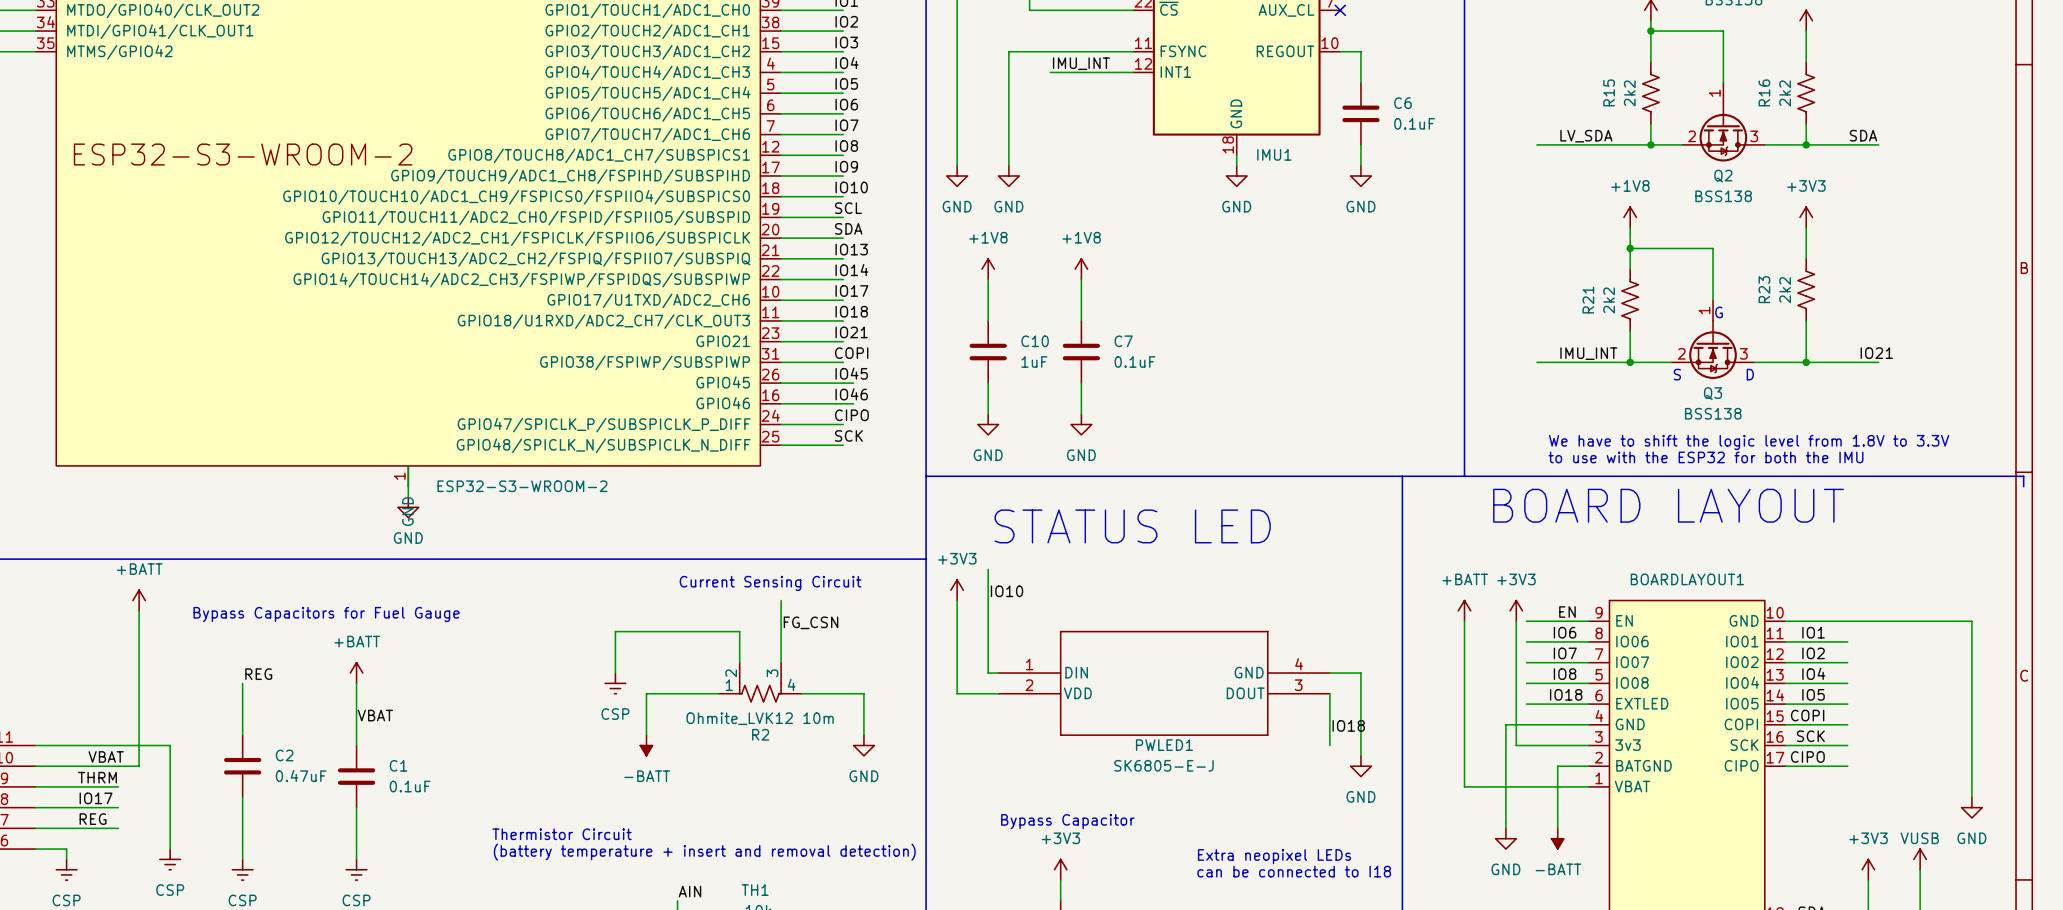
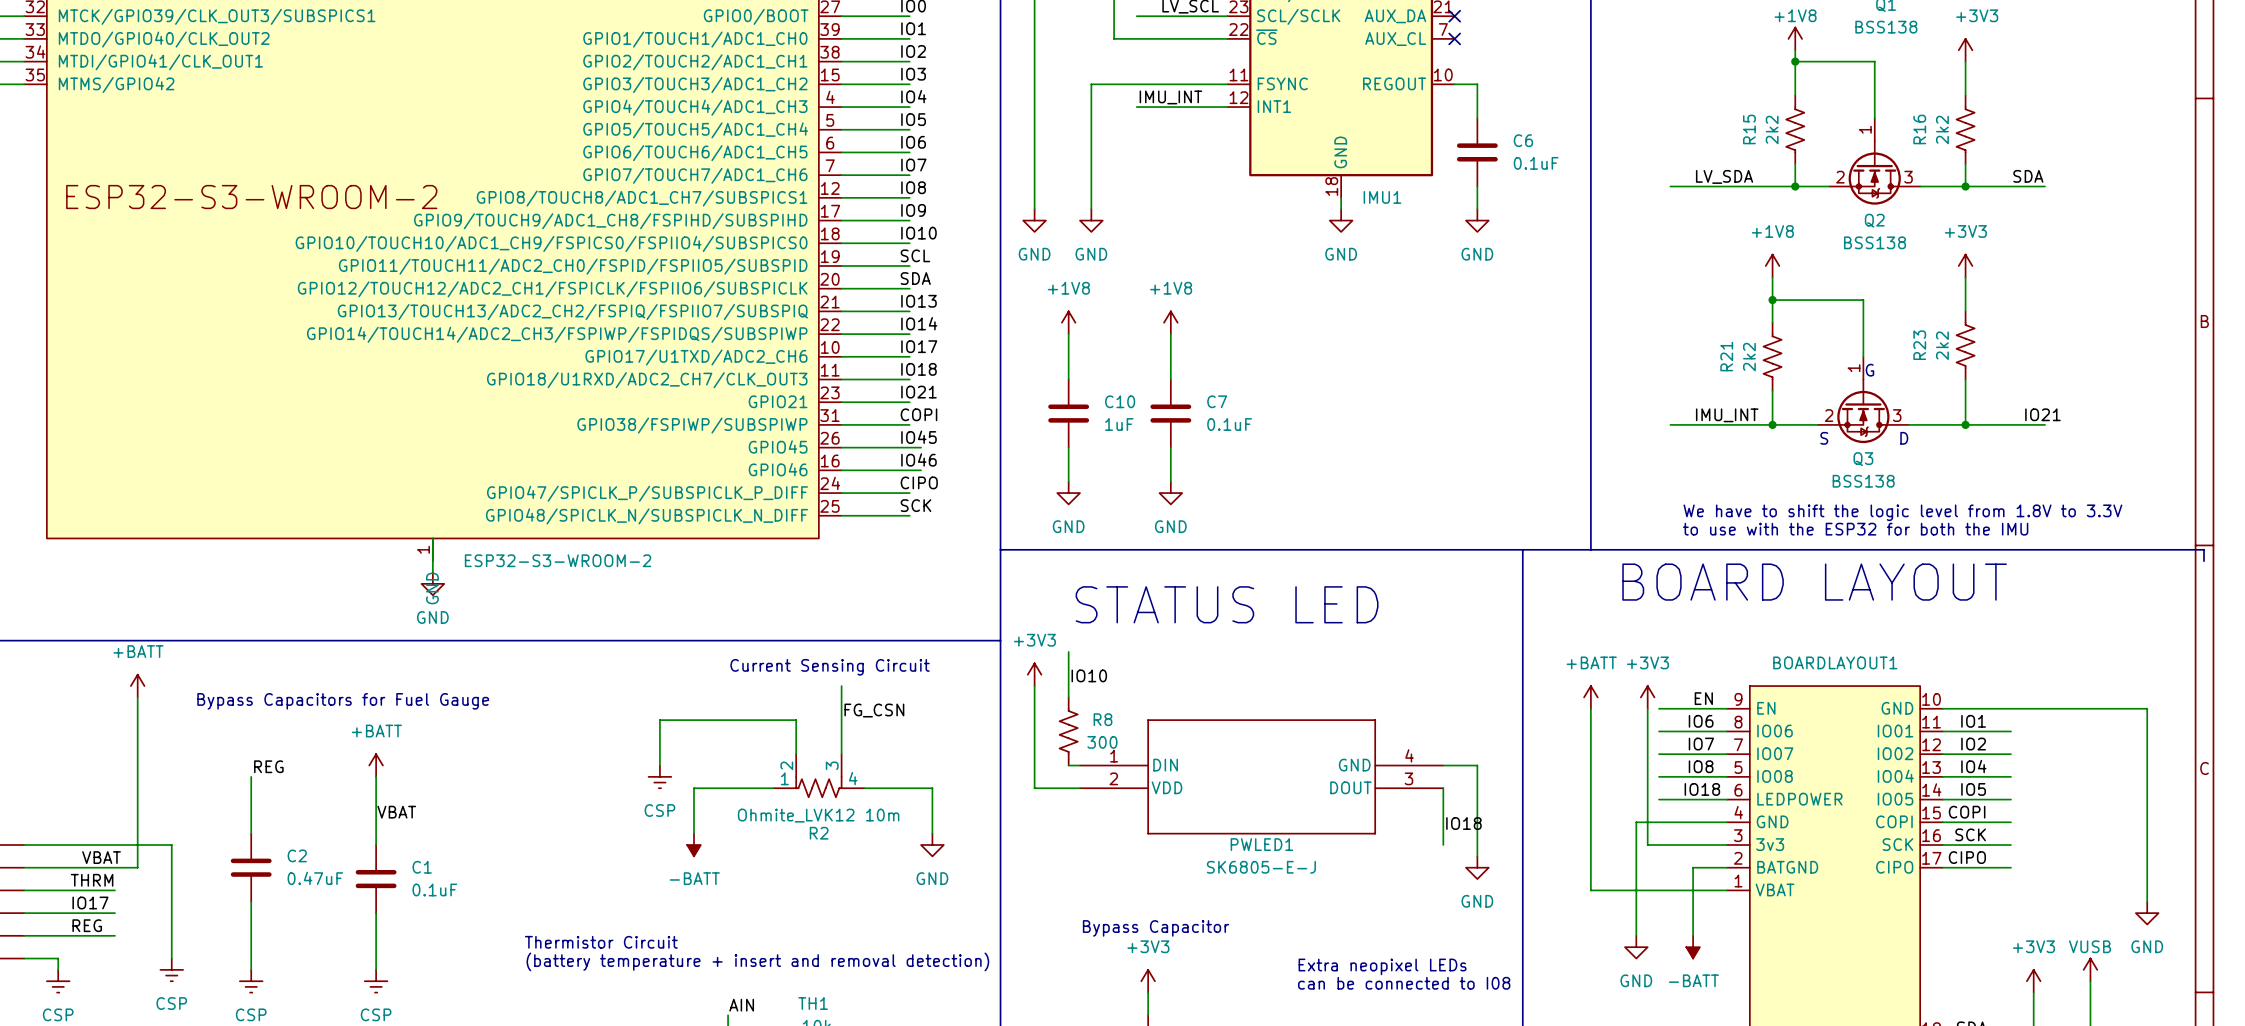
R8: none -> 300 (1068, 731)
BOARDLAYOUT1 pin name: EXTLED (1642, 703) -> LEDPOWER (1799, 799)
text: can be connected to I18 (1294, 871) -> can be connected to I08 (1404, 983)

